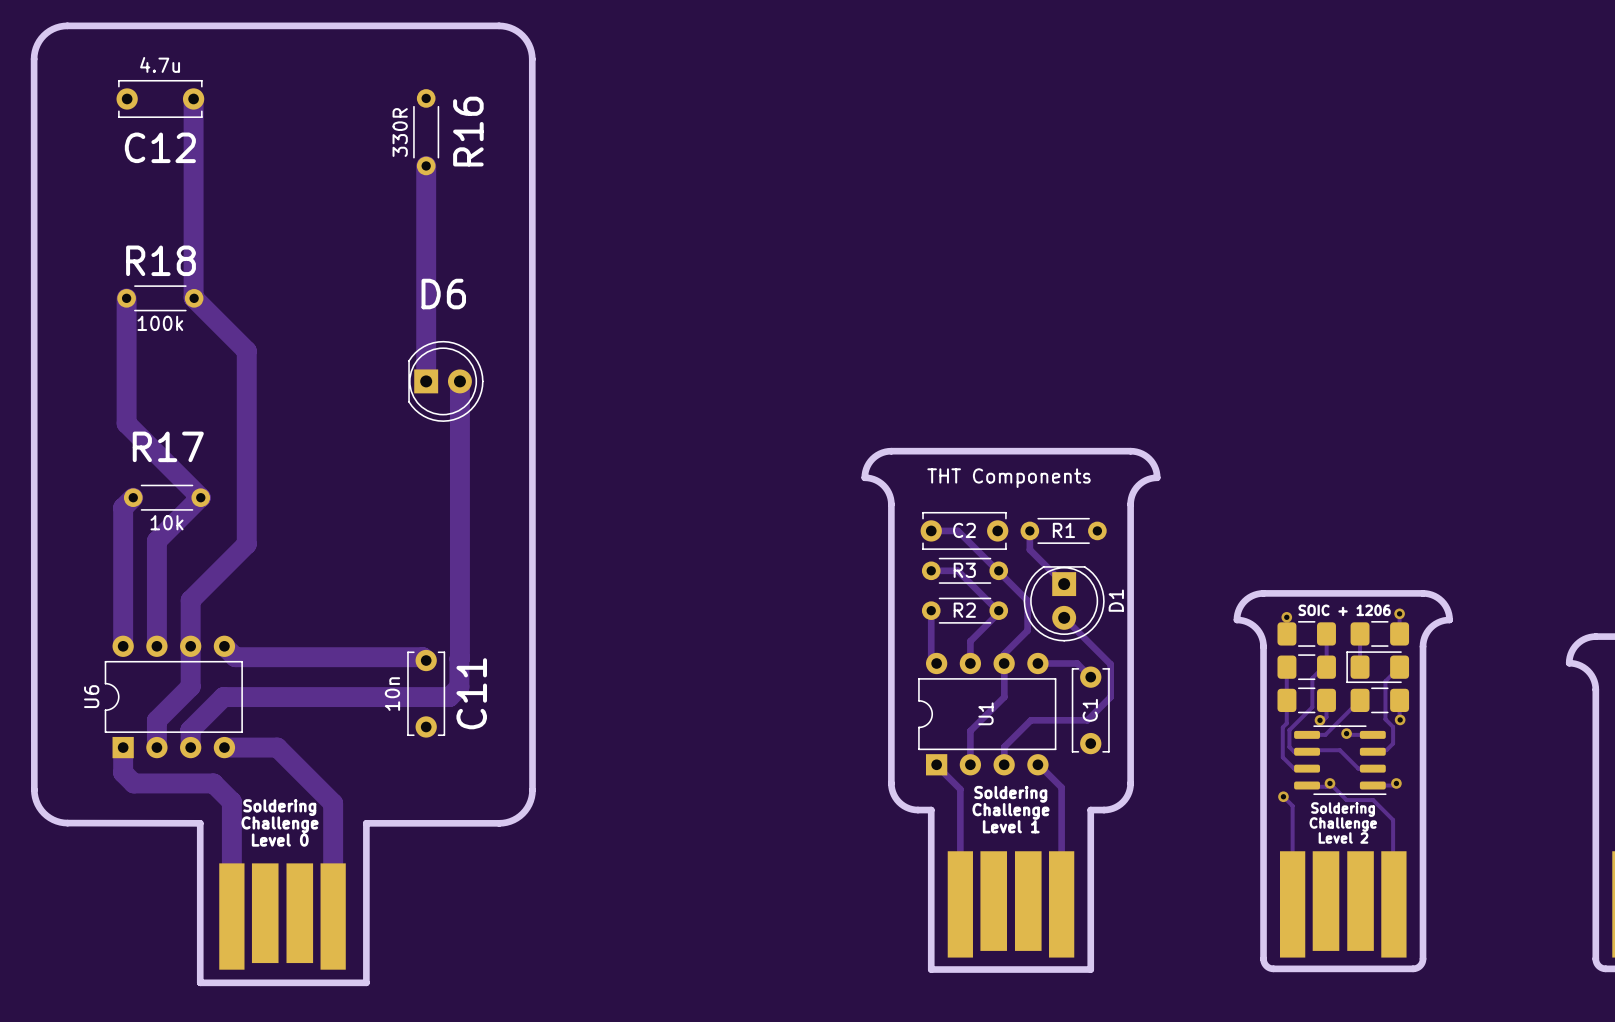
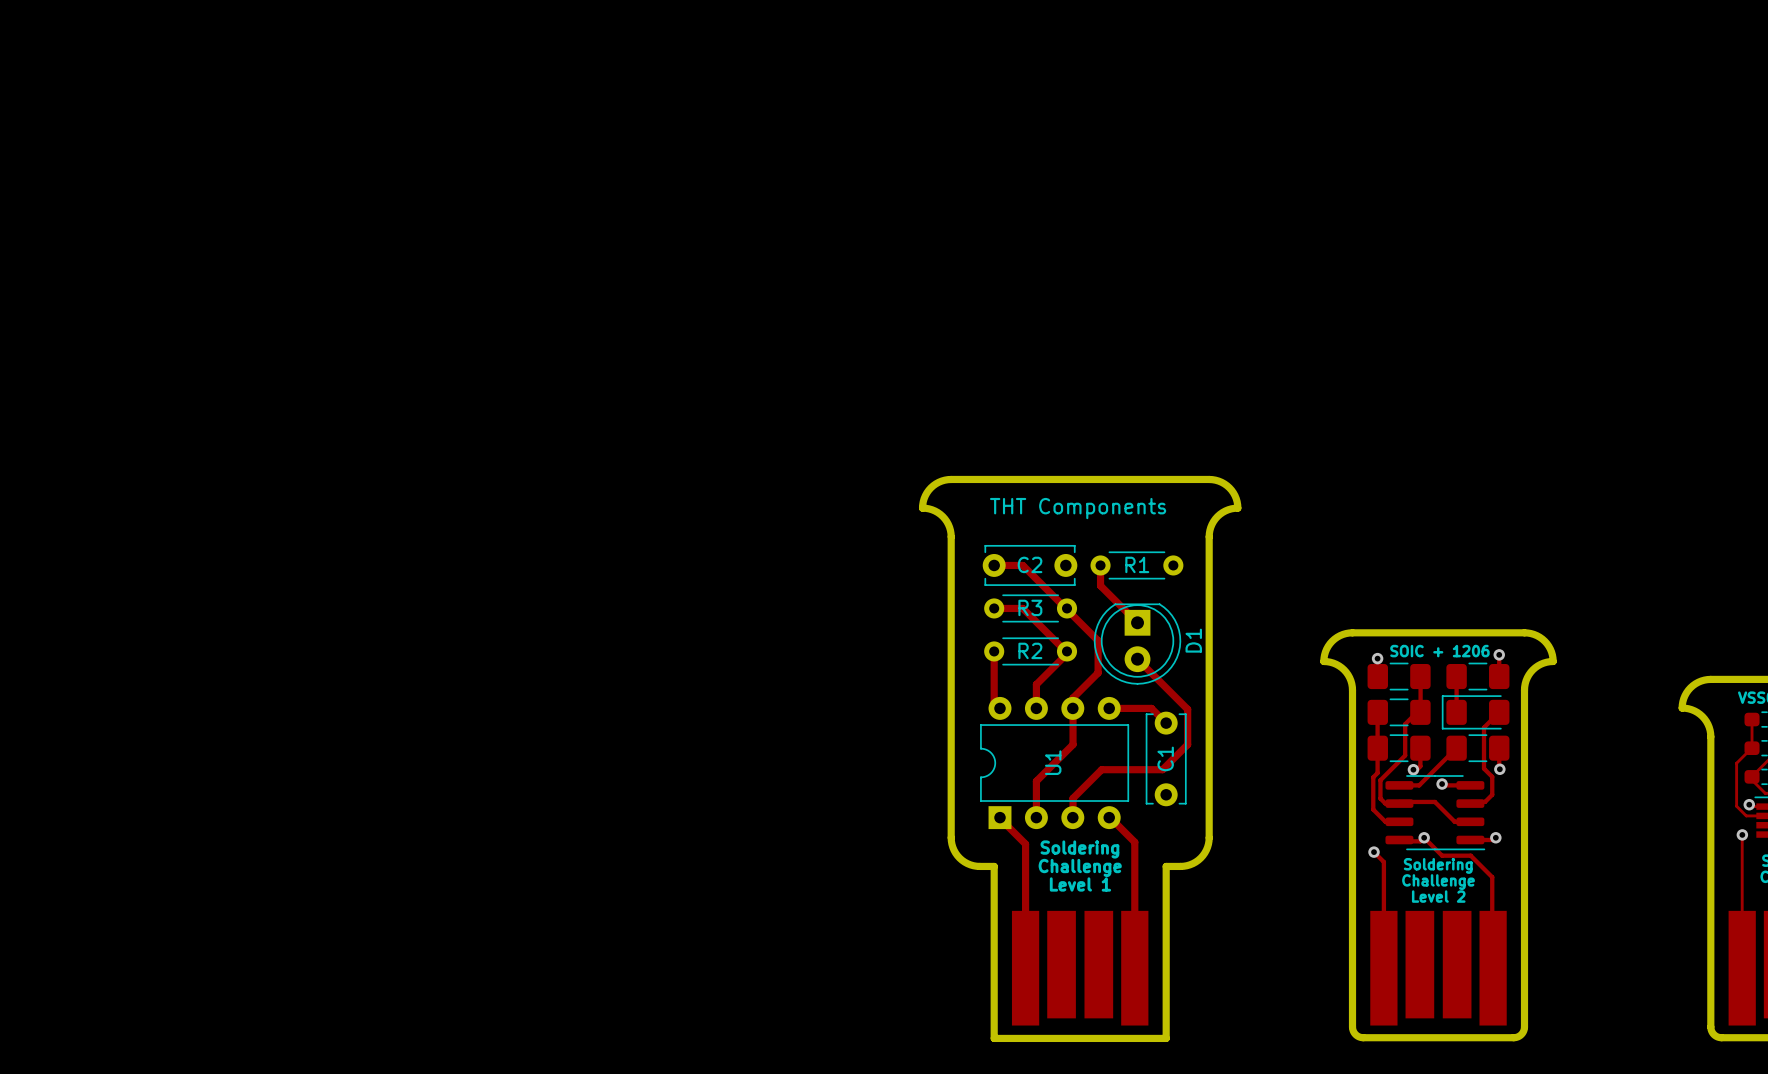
board edge: (67, 25) (499, 25) (510, 27) (519, 33) (530, 48) (532, 59) (531, 797) (522, 813) (513, 820) (503, 823) (366, 823) (366, 982) (200, 982) (200, 823) (63, 822) (46, 815) (36, 800) (34, 789) (34, 59) (35, 48) (43, 35) (56, 27) (67, 25) -> none
C12: 4.7u (160, 98) -> none
track: (193, 98) (193, 297) (246, 350) (246, 544) (190, 600) (190, 686) (156, 720) (156, 747) -> none
R16: 330R (426, 132) -> none
track: (426, 165) (426, 381) -> none
track: (126, 298) (126, 423) (200, 497) (156, 541) (156, 646) -> none
R18: 100k (160, 298) -> none
D6: (445, 381) -> none
track: (459, 381) (459, 687) (449, 697) (223, 697) (190, 730) (190, 747) -> none
track: (133, 497) (123, 507) (123, 646) -> none
R17: 10k (167, 497) -> none
track: (224, 646) (235, 657) (422, 657) (426, 660) -> none
C11: 10n (426, 693) -> none
U6: (173, 696) -> none
track: (123, 747) (123, 772) (133, 783) (213, 783) (231, 801) (231, 916) -> none
track: (224, 747) (277, 747) (333, 803) (333, 916) -> none
text: Soldering (279, 807) -> none
text: Challenge (279, 824) -> none
text: Level 0 (280, 840) -> none
part: (282, 916) -> none

